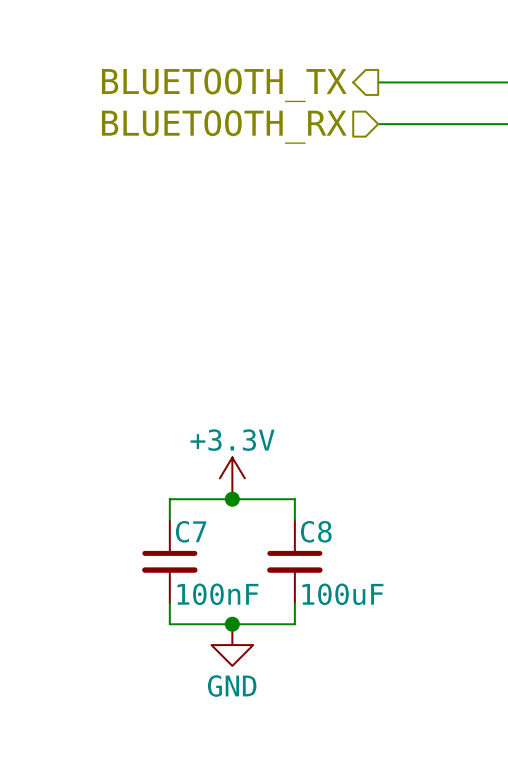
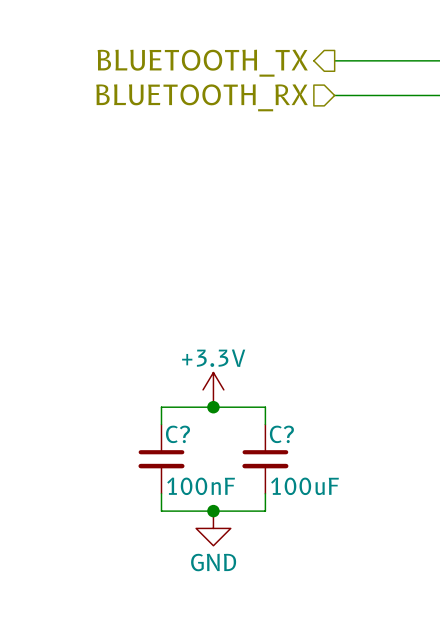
C7 name: C7 (191, 531) -> C? (177, 434)
C8 name: C8 (316, 531) -> C? (281, 434)

